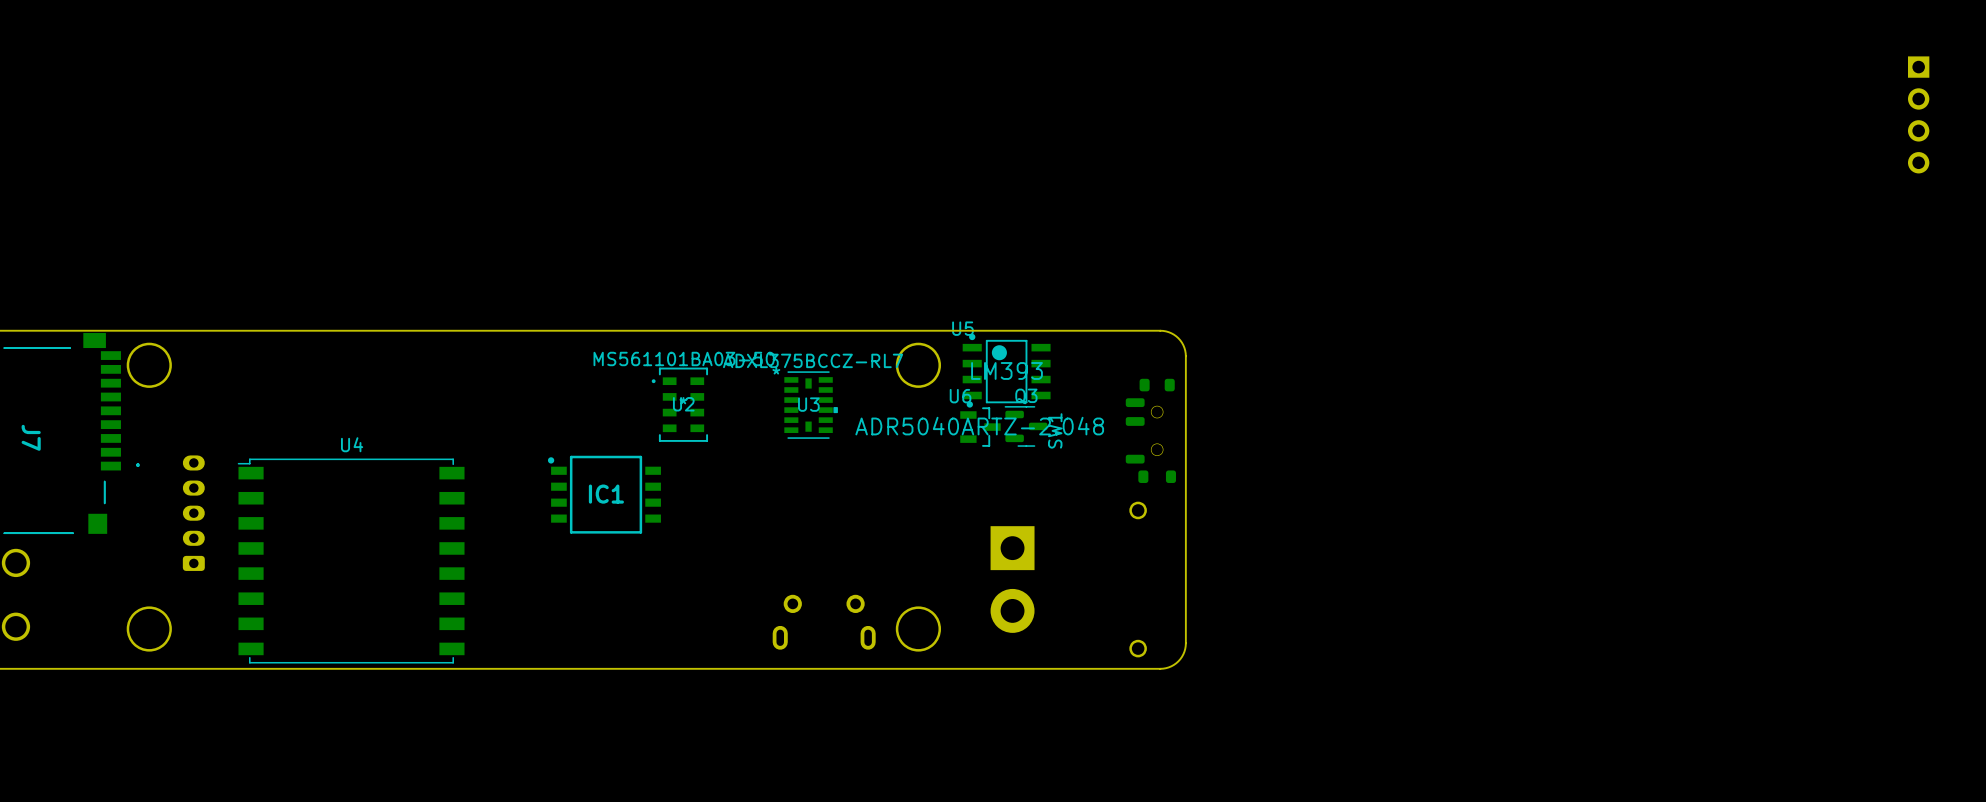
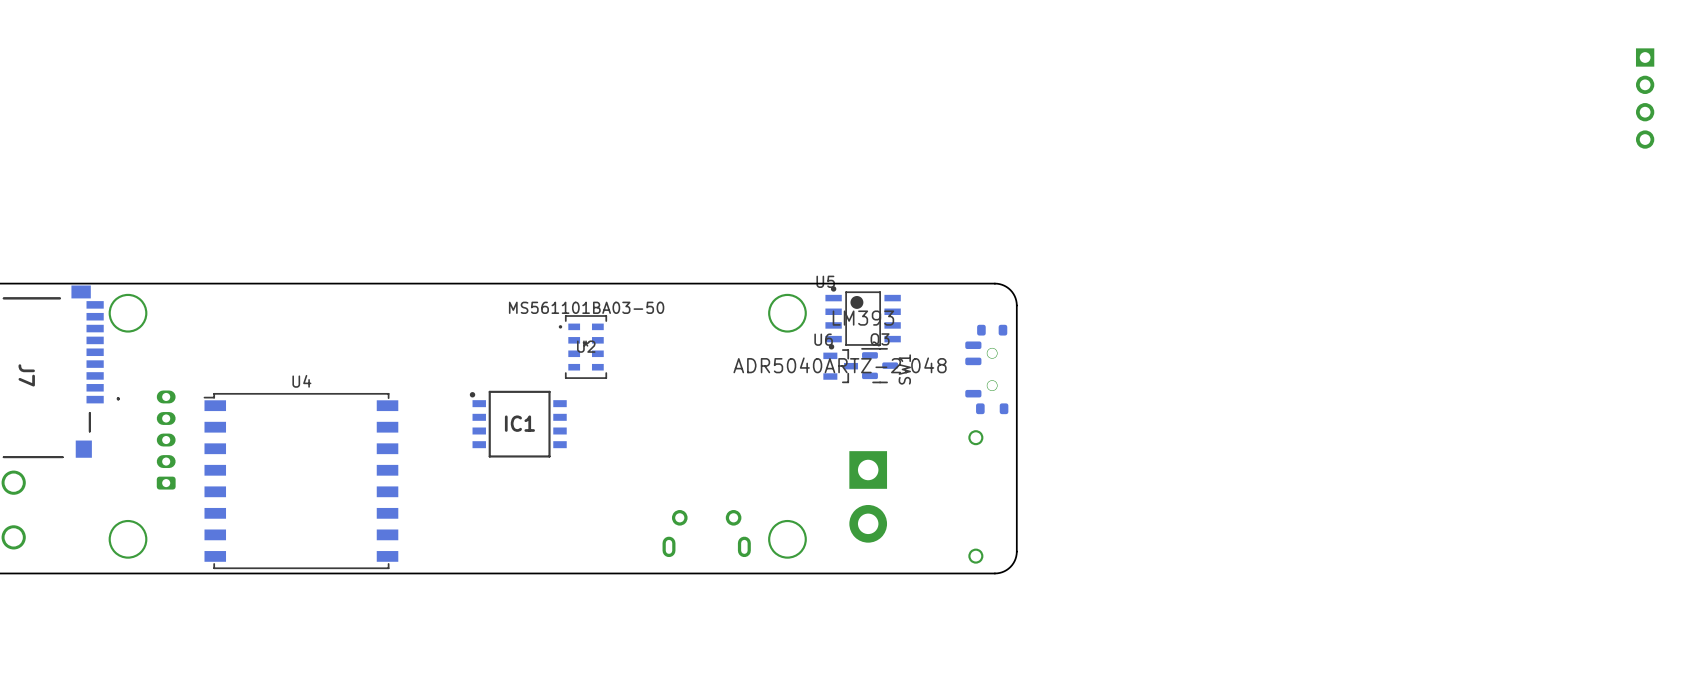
U3: ADXL375BCCZ-RL7 (811, 405) -> none

